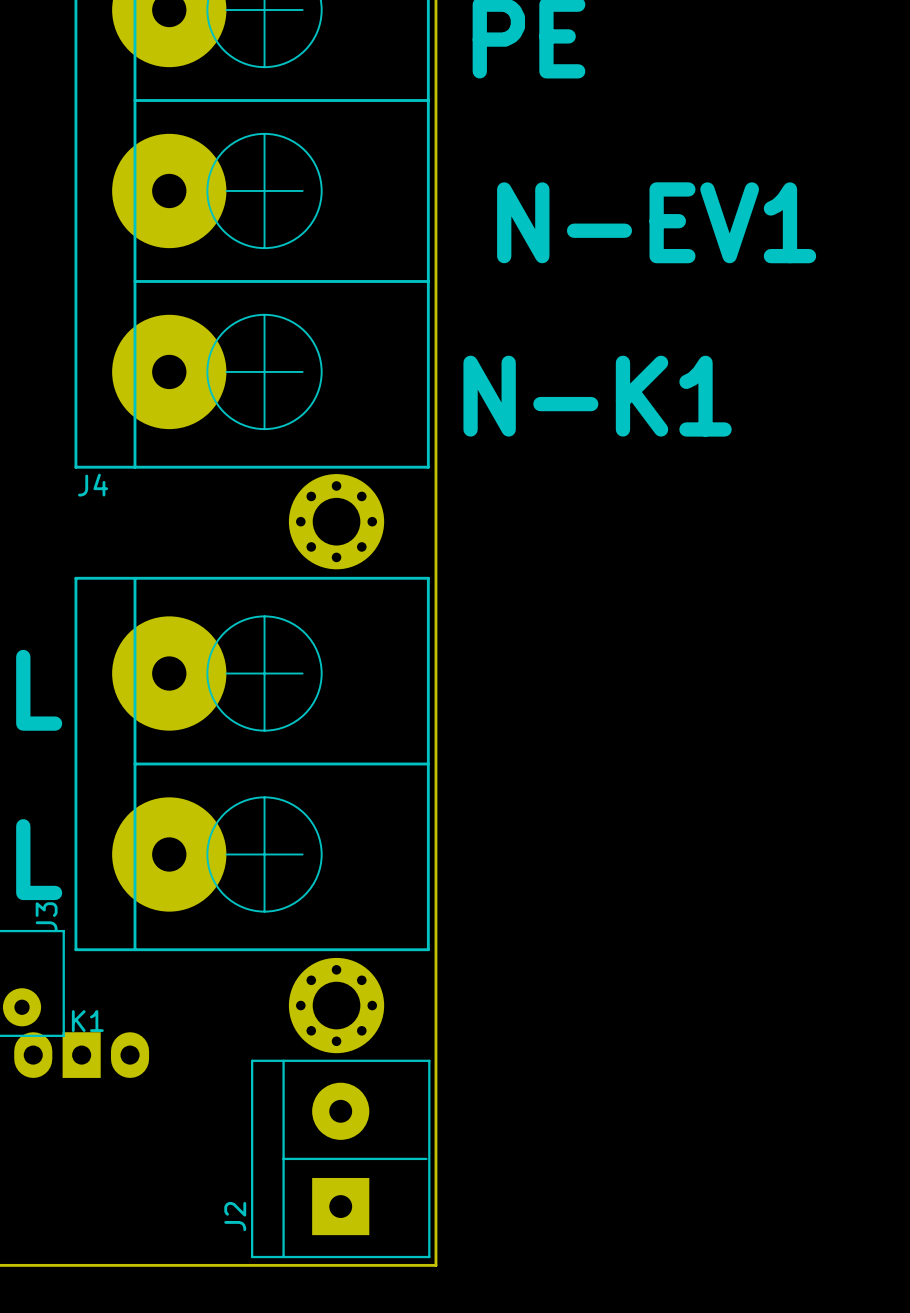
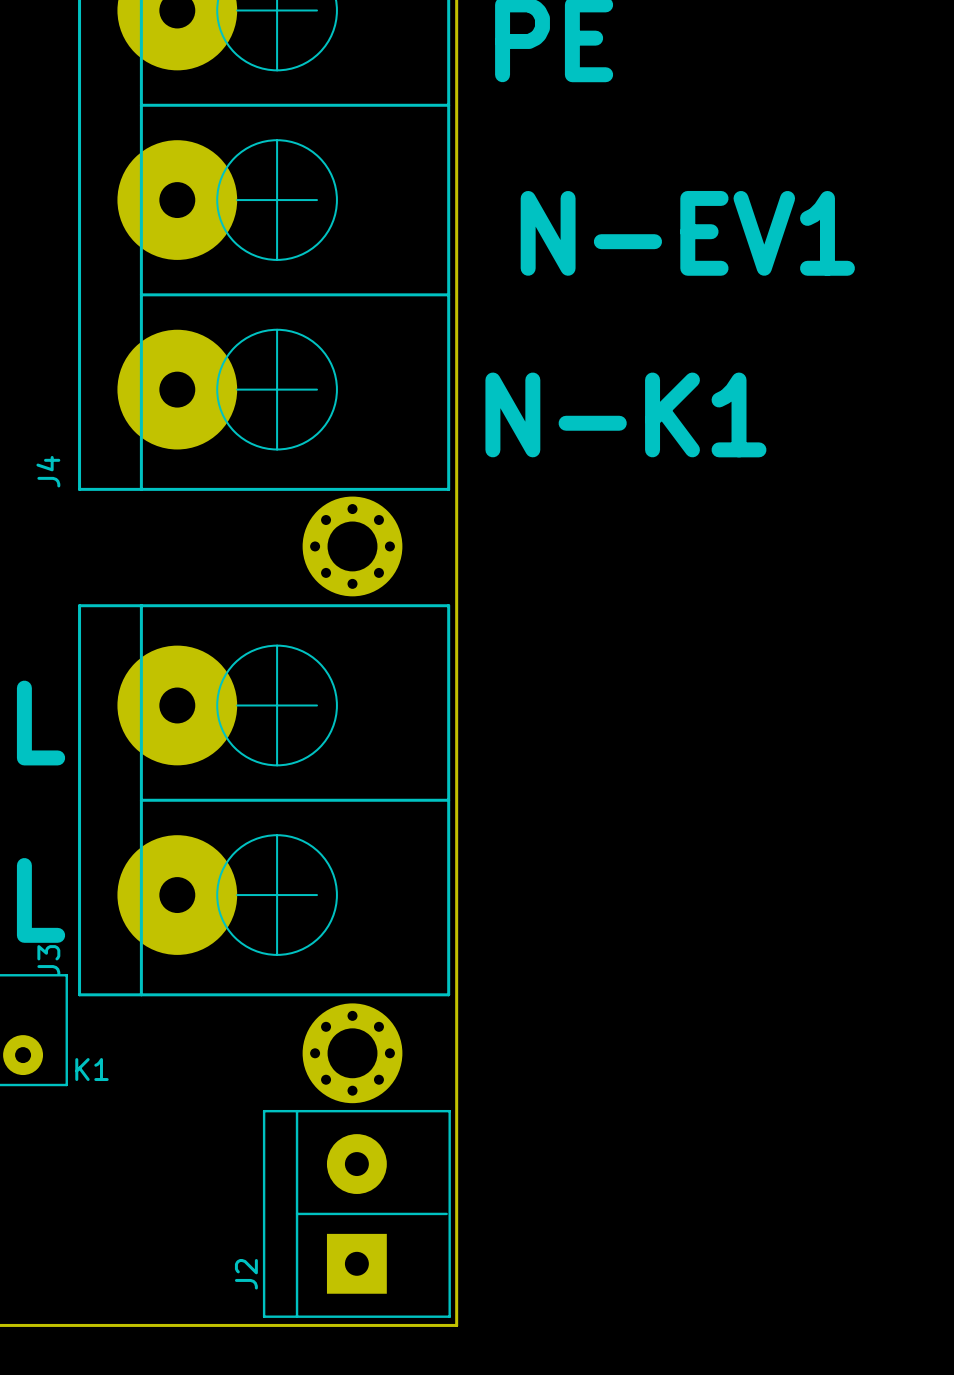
J4 name rotation: 0° (93, 485) -> 90° counterclockwise (48, 471)
J4 name position: J4 (93, 485) -> J4 (48, 471)
part: (81, 1055) -> none

